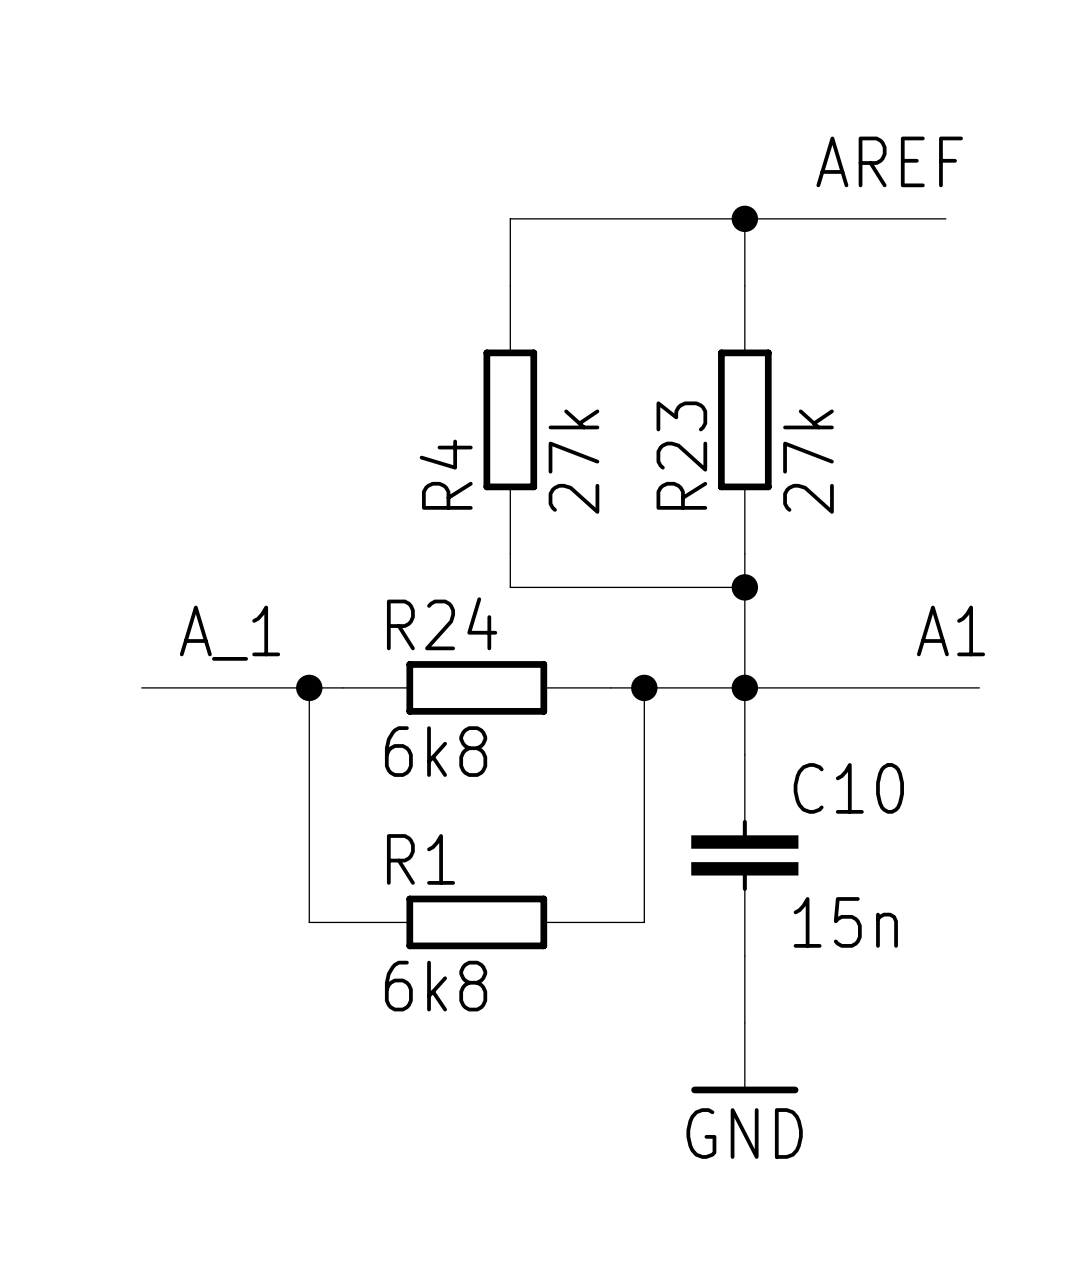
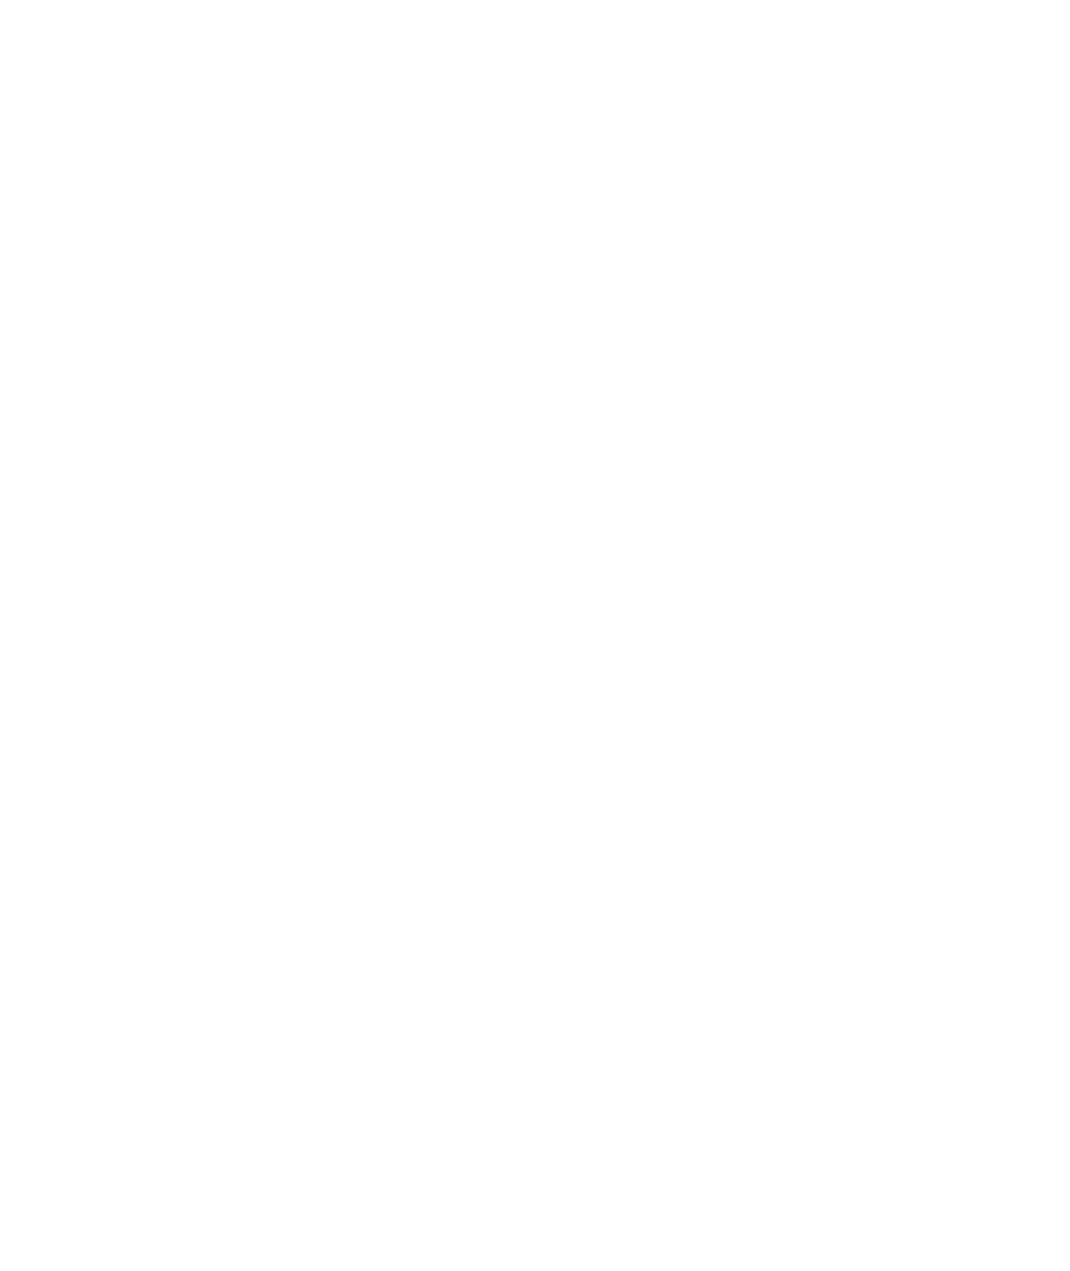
label: AREF (889, 161) -> none
wire: (744, 218) (744, 285) -> none
junction: (744, 218) -> none
wire: (945, 218) (510, 218) (510, 285) -> none
R4: 27k (510, 419) -> none
R23: 27k (744, 419) -> none
wire: (510, 553) (510, 587) (744, 587) -> none
wire: (744, 553) (744, 754) -> none
junction: (744, 587) -> none
label: A1 (951, 630) -> none
label: A_1 (230, 633) -> none
wire: (141, 687) (342, 687) -> none
wire: (309, 687) (309, 922) (342, 922) -> none
junction: (309, 687) -> none
R24: 6k8 (476, 687) -> none
wire: (610, 687) (979, 687) -> none
wire: (644, 687) (644, 922) (610, 922) -> none
junction: (644, 687) -> none
junction: (744, 687) -> none
C10: 15n (744, 855) -> none
R1: 6k8 (476, 922) -> none
wire: (744, 955) (744, 1022) -> none
power symbol: GND (744, 1058) -> none

